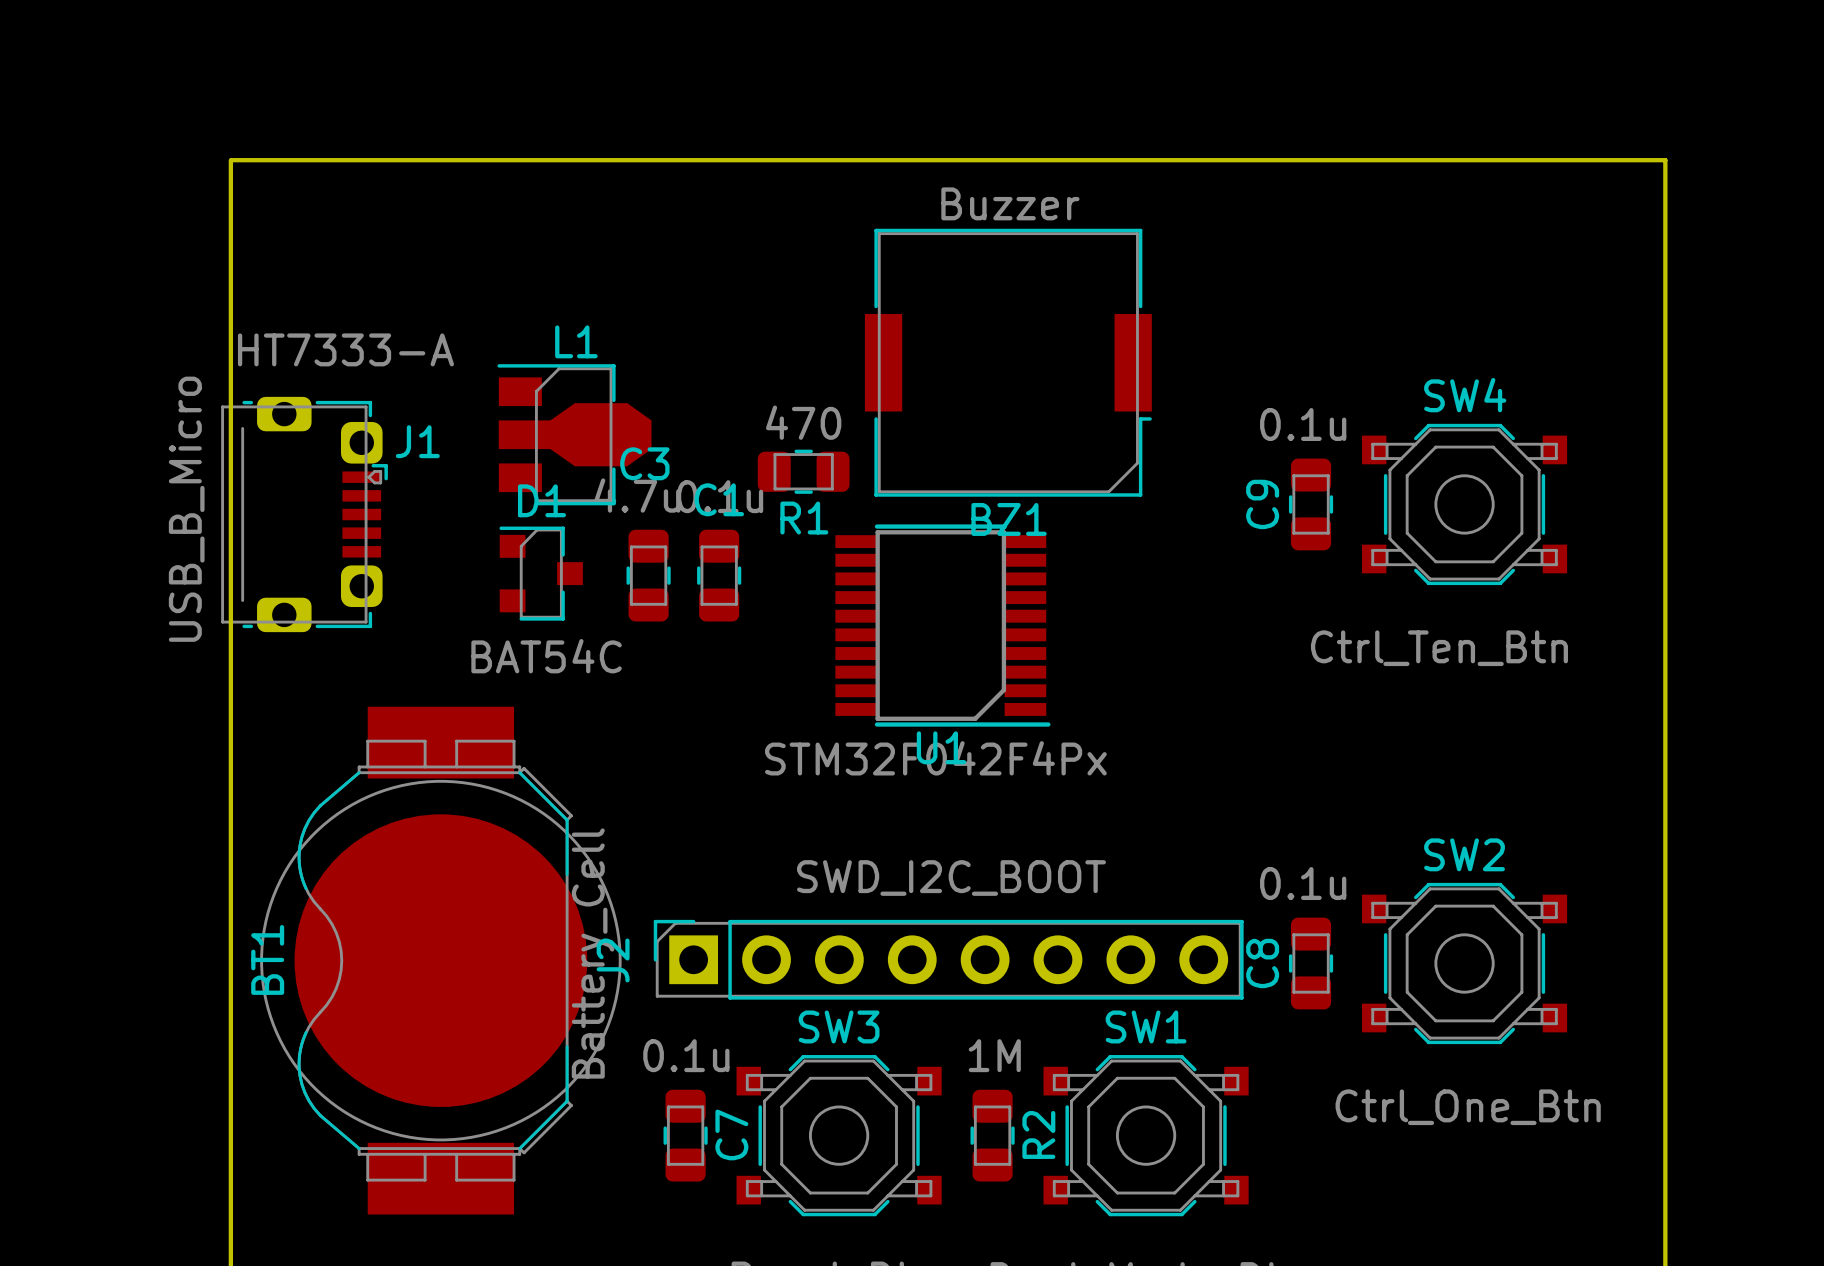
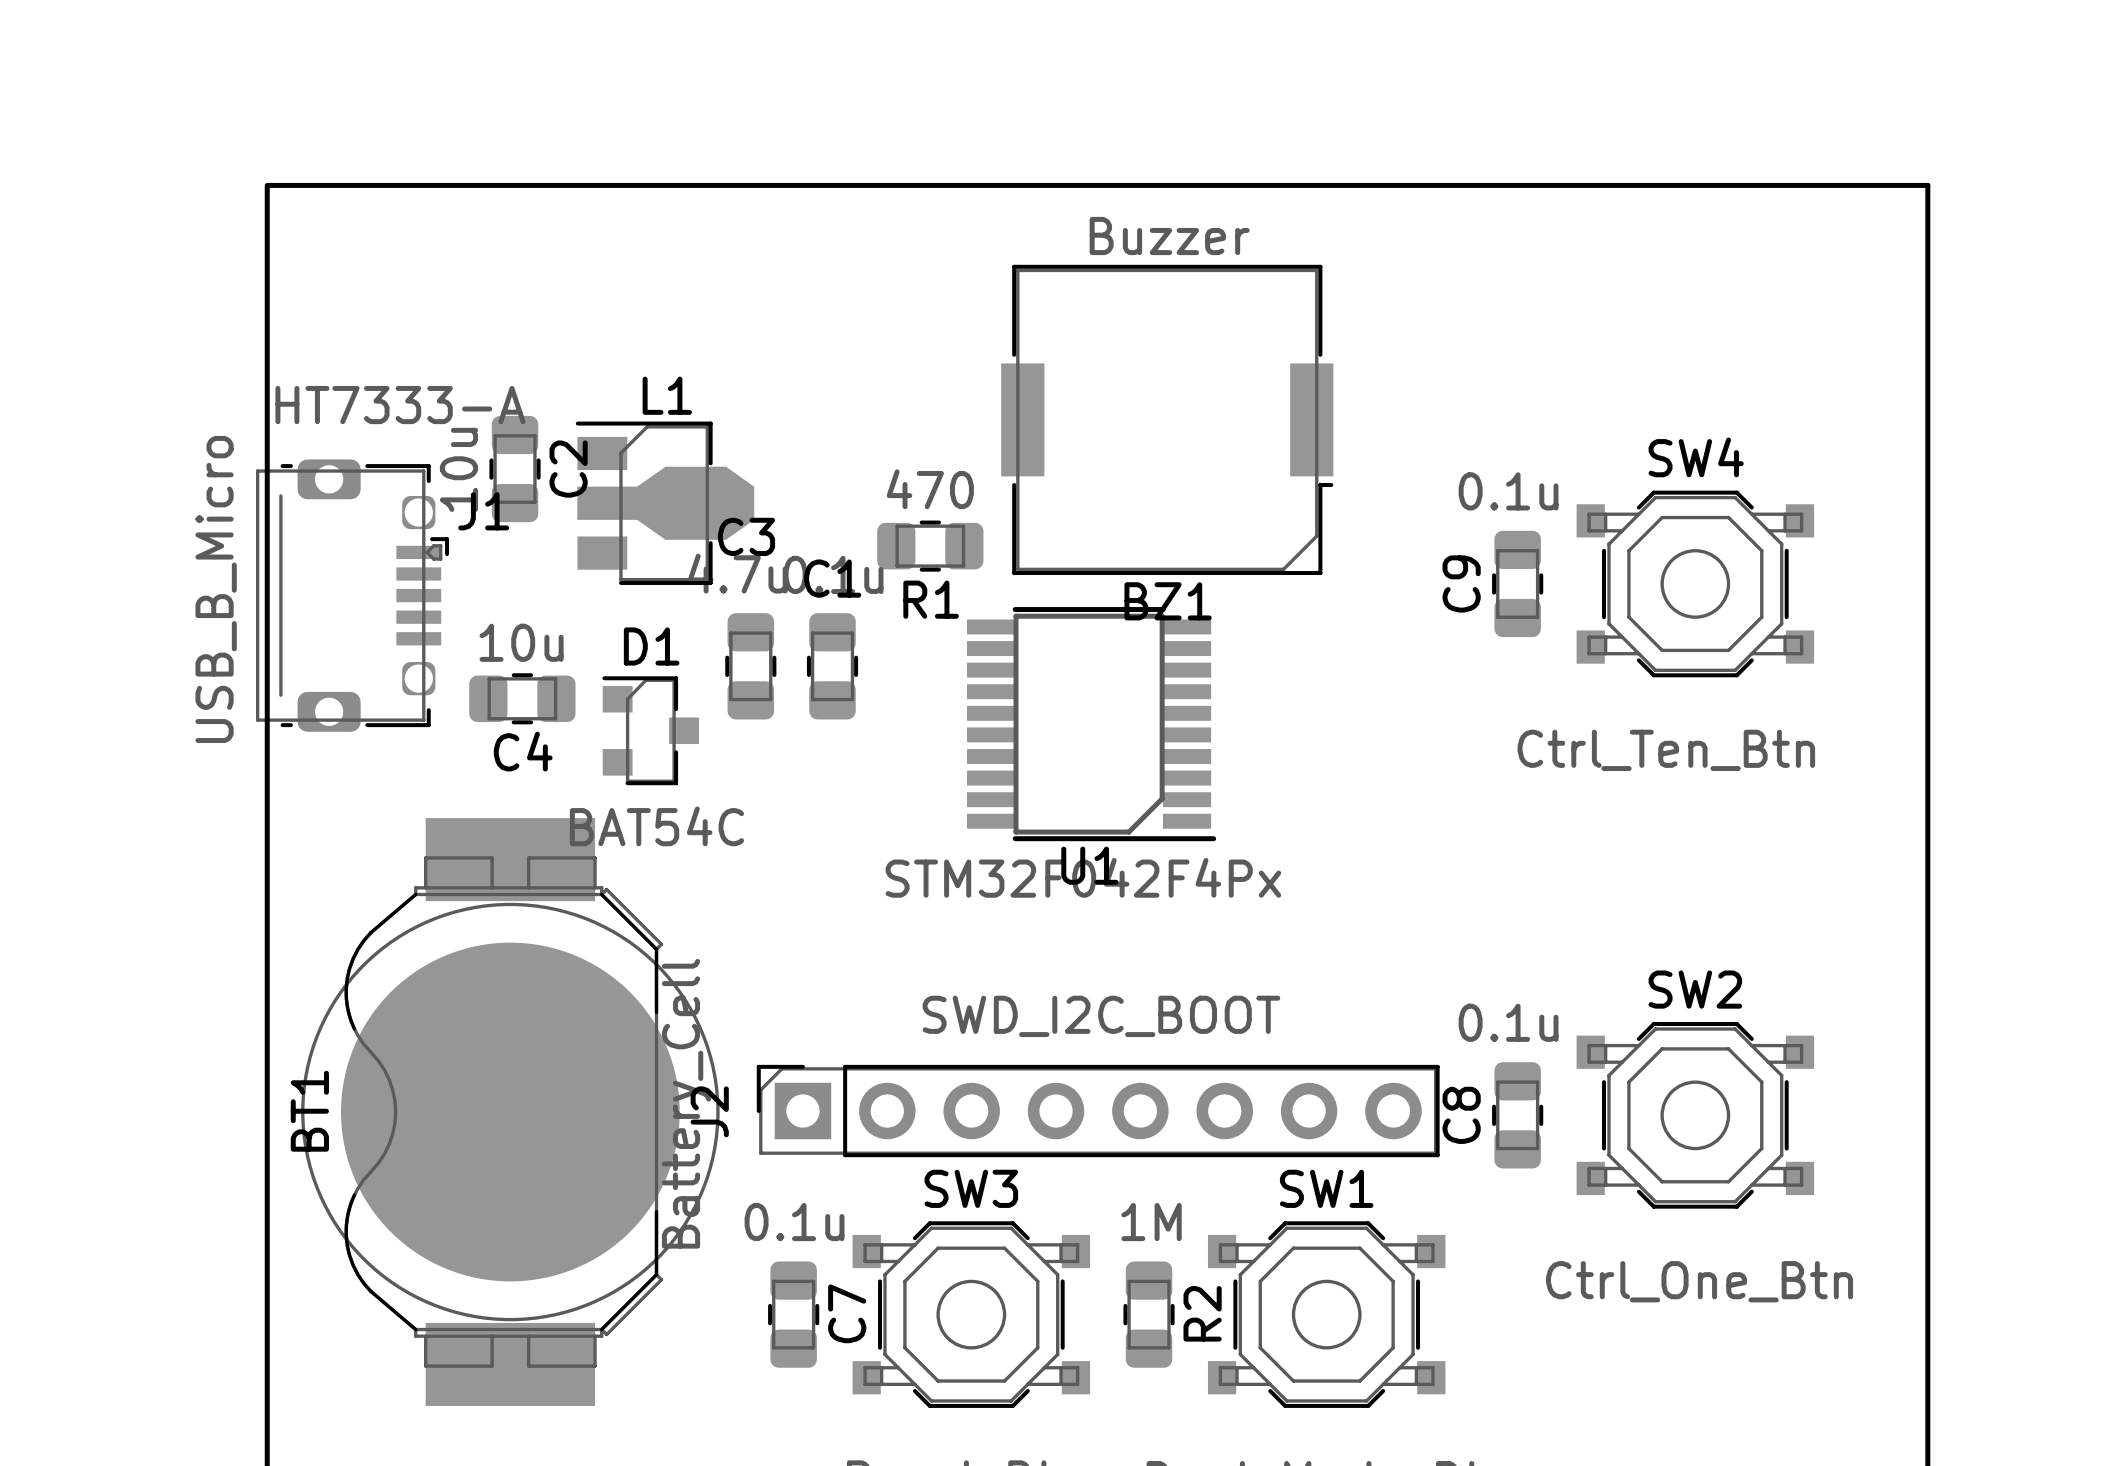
J1 footprint: [221, 396, 388, 633] -> [255, 459, 450, 732]
C2: none -> 10u (515, 469)
D1 position: (541, 573) -> (650, 730)
C4: none -> 10u (522, 698)

